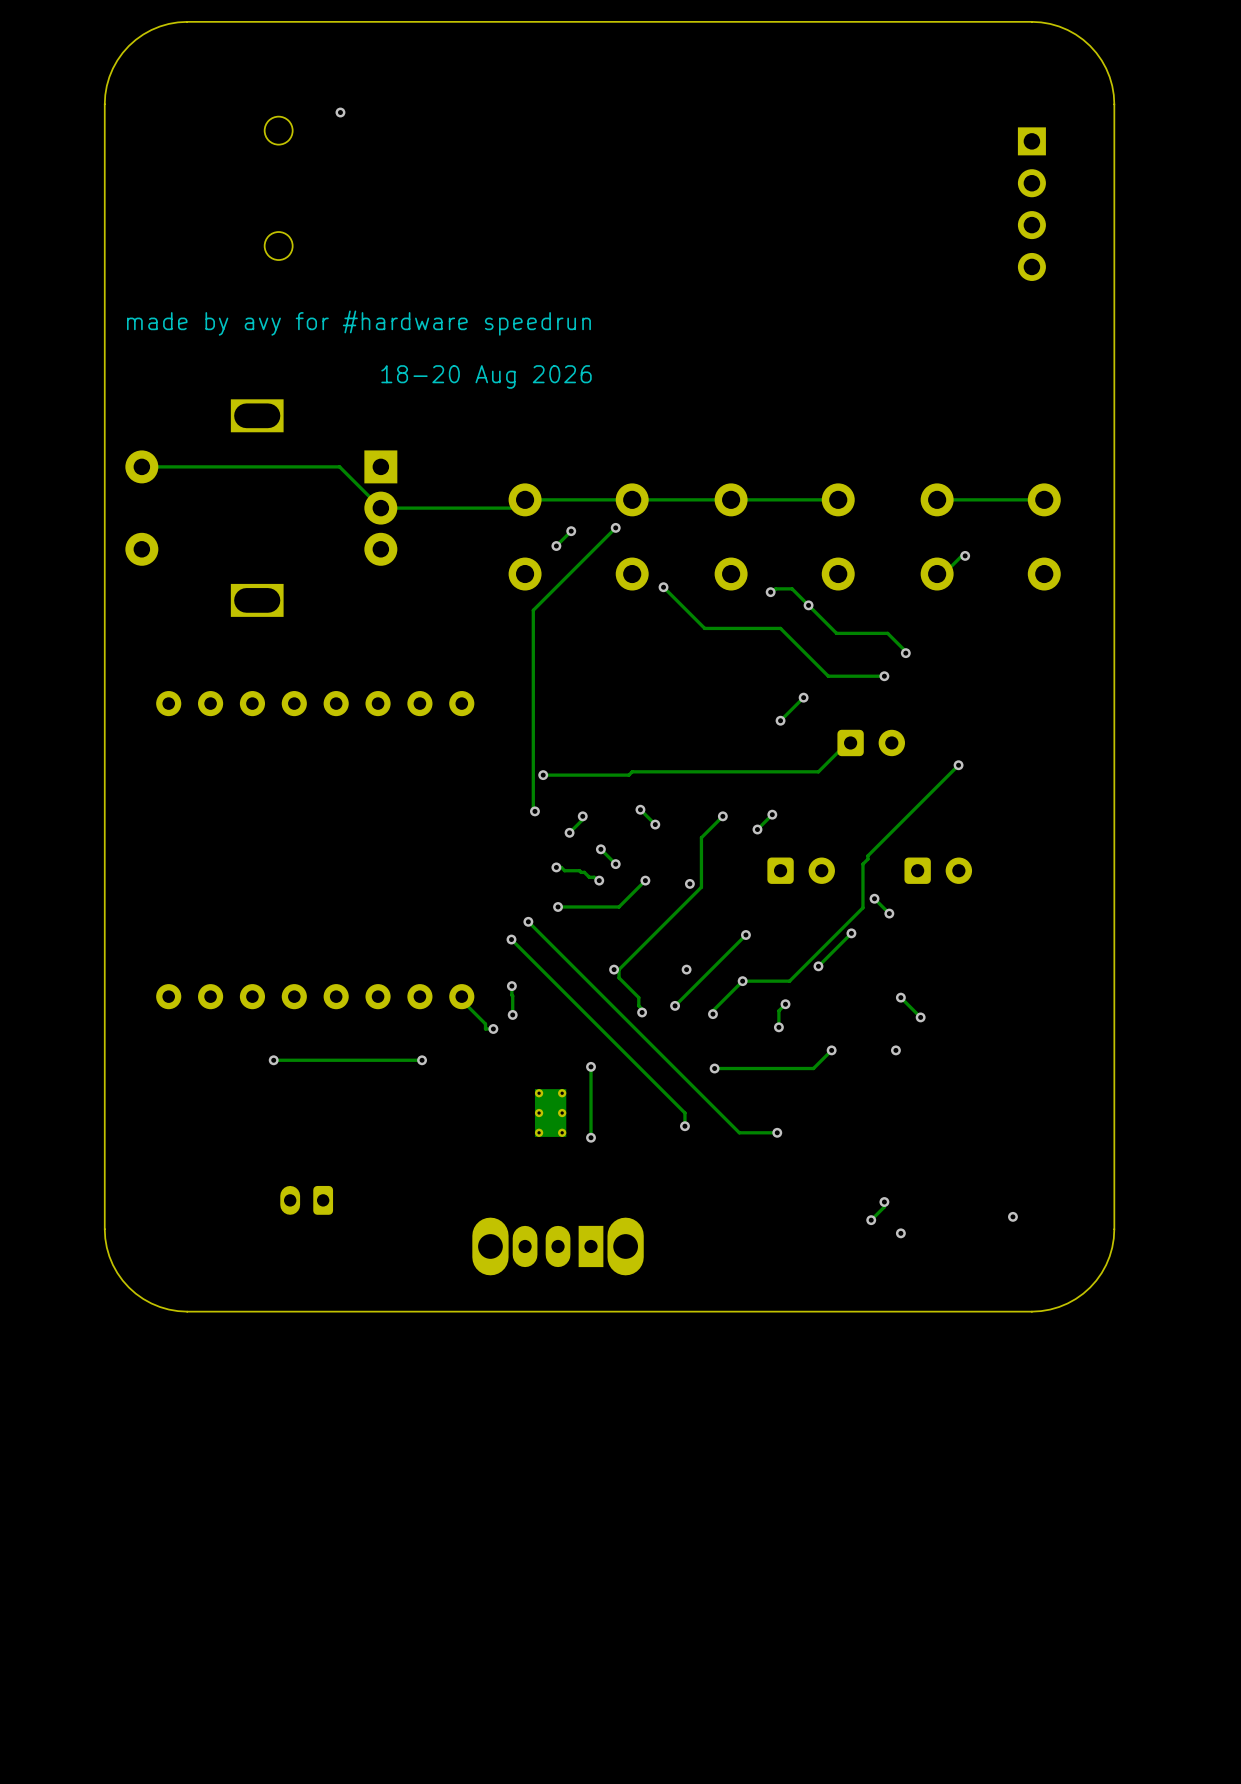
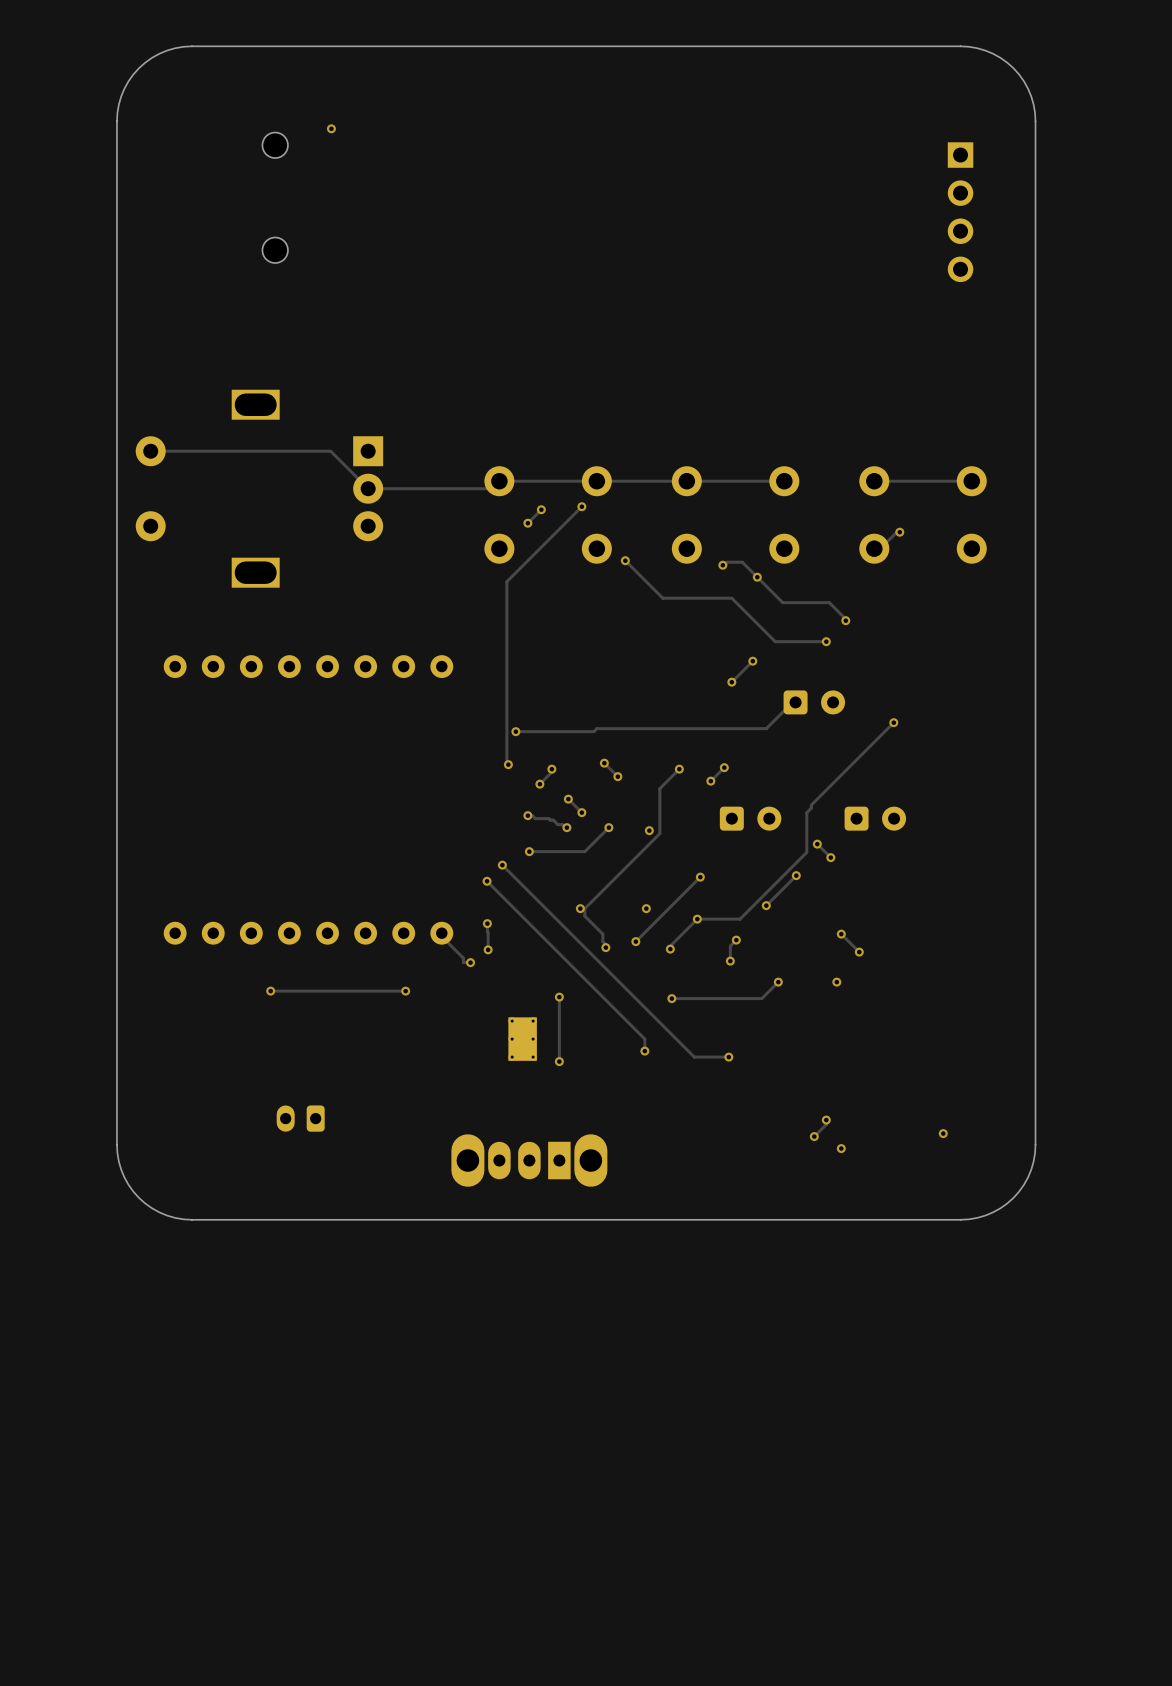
text: made by avy for #hardware speedrun (358, 323) -> none
text: 18-20 Aug 2026 (486, 376) -> none

